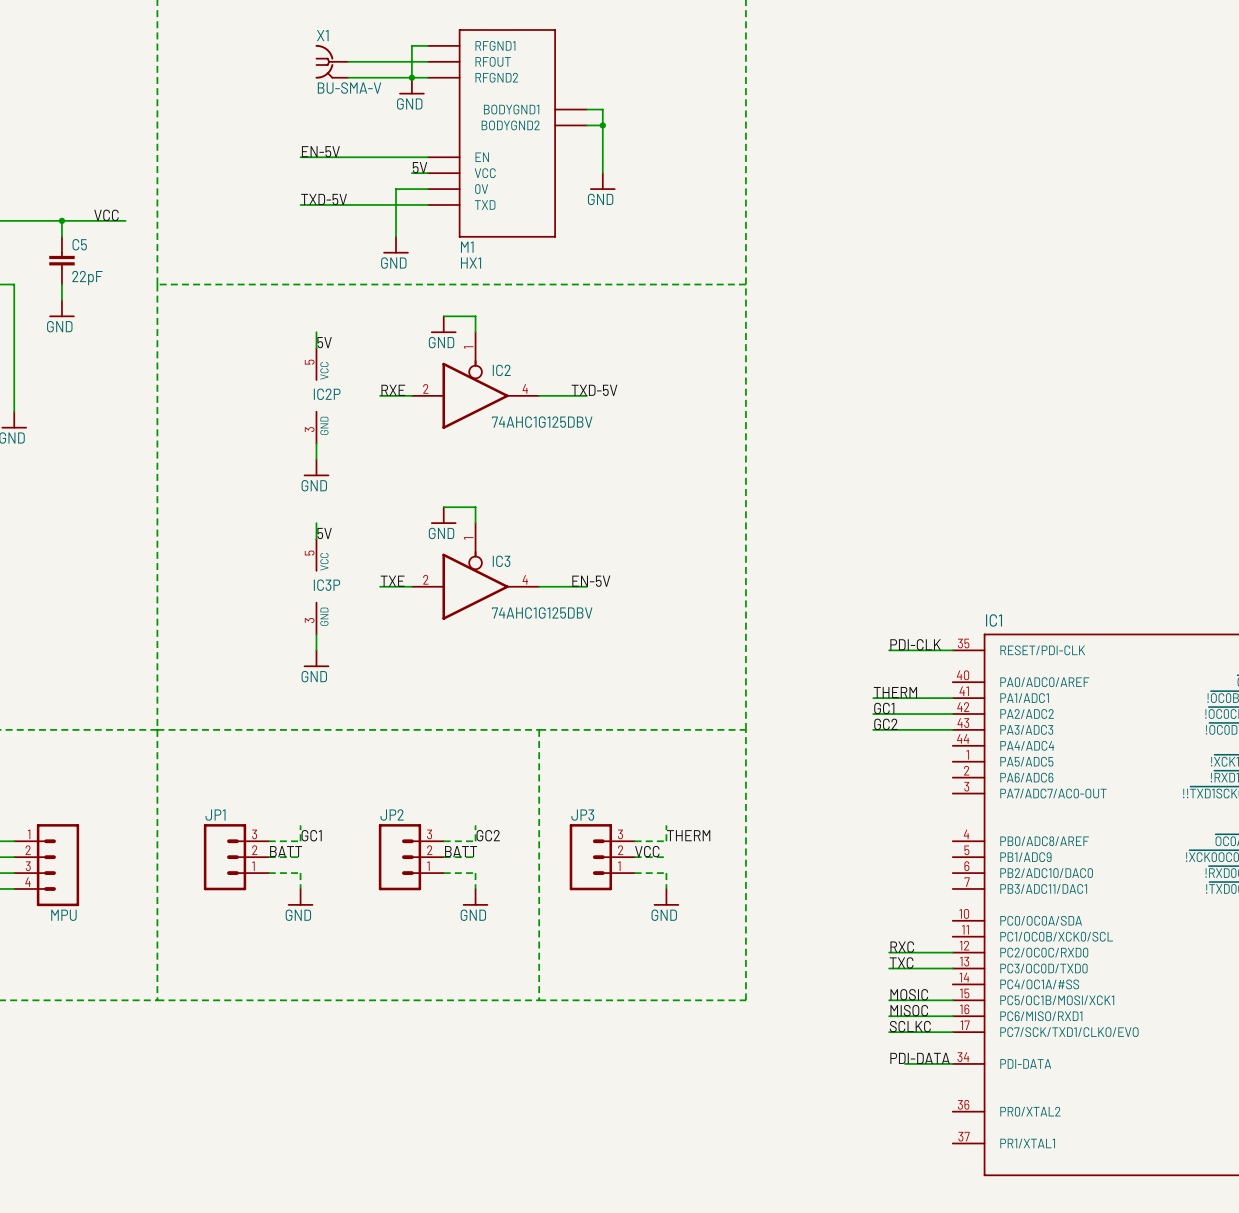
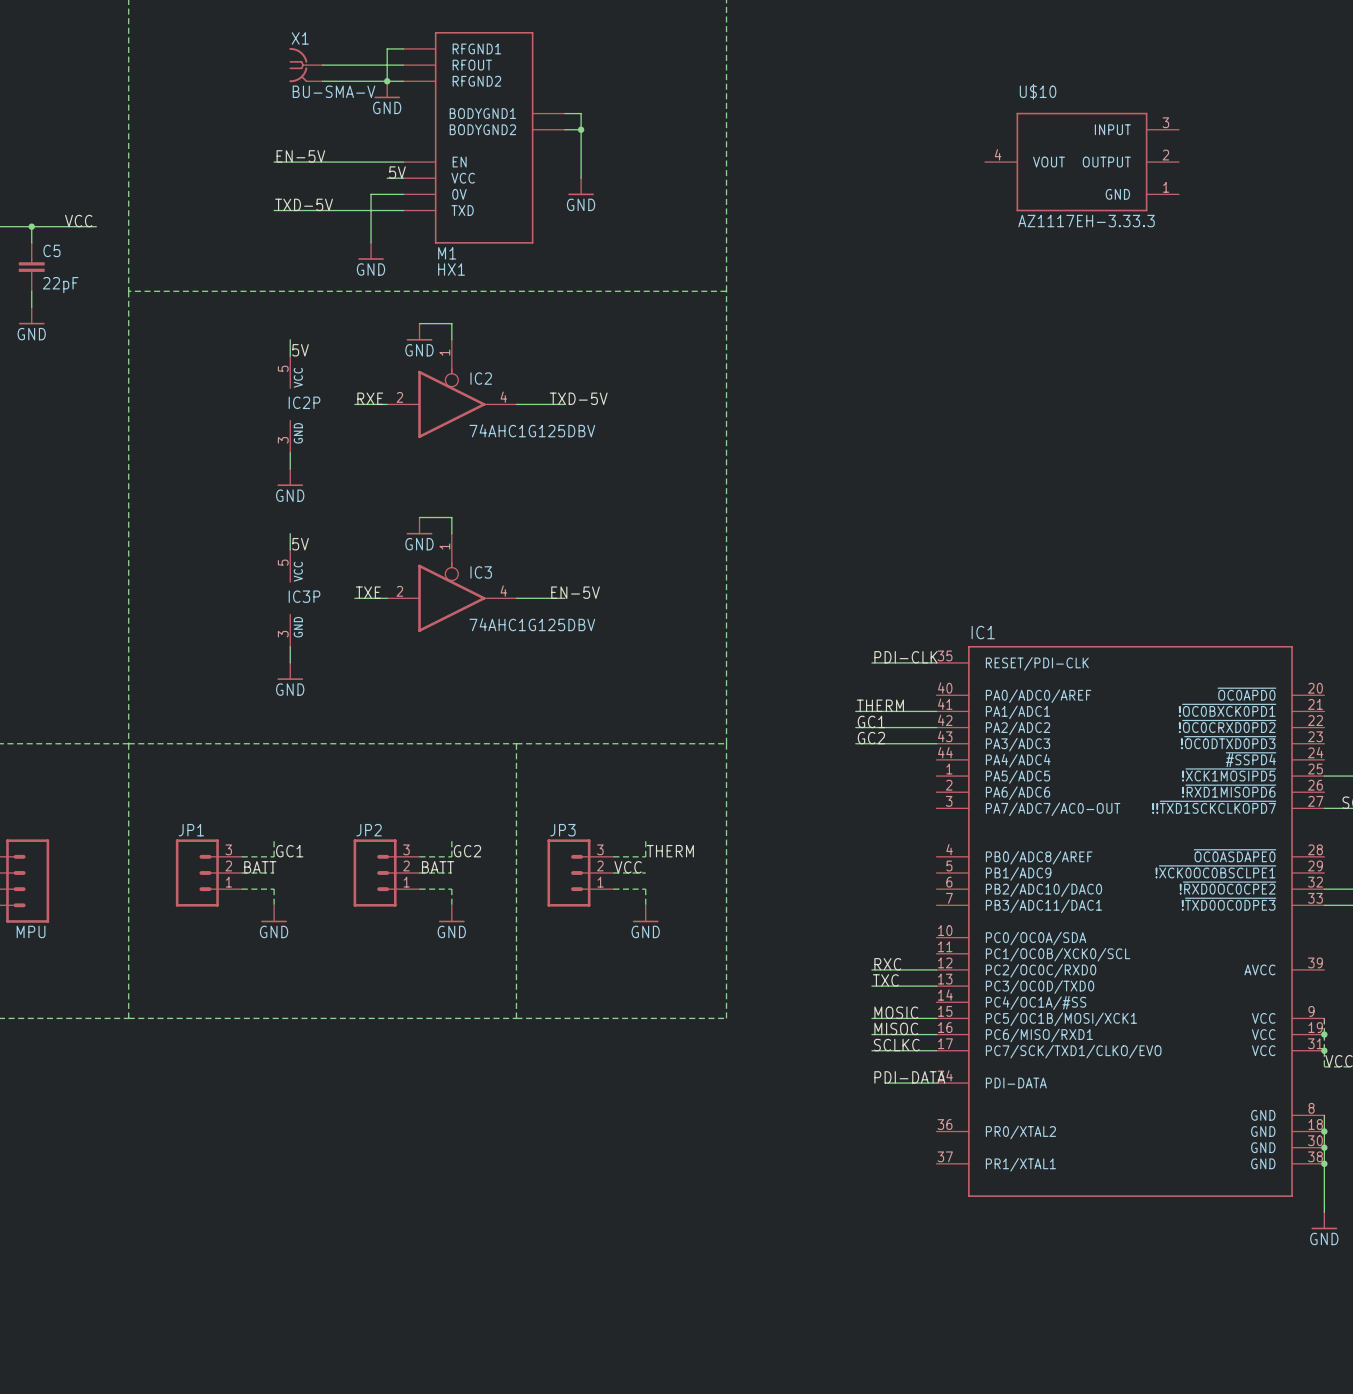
U$10: none -> AZ1117EH-3.33.3 (1081, 162)

